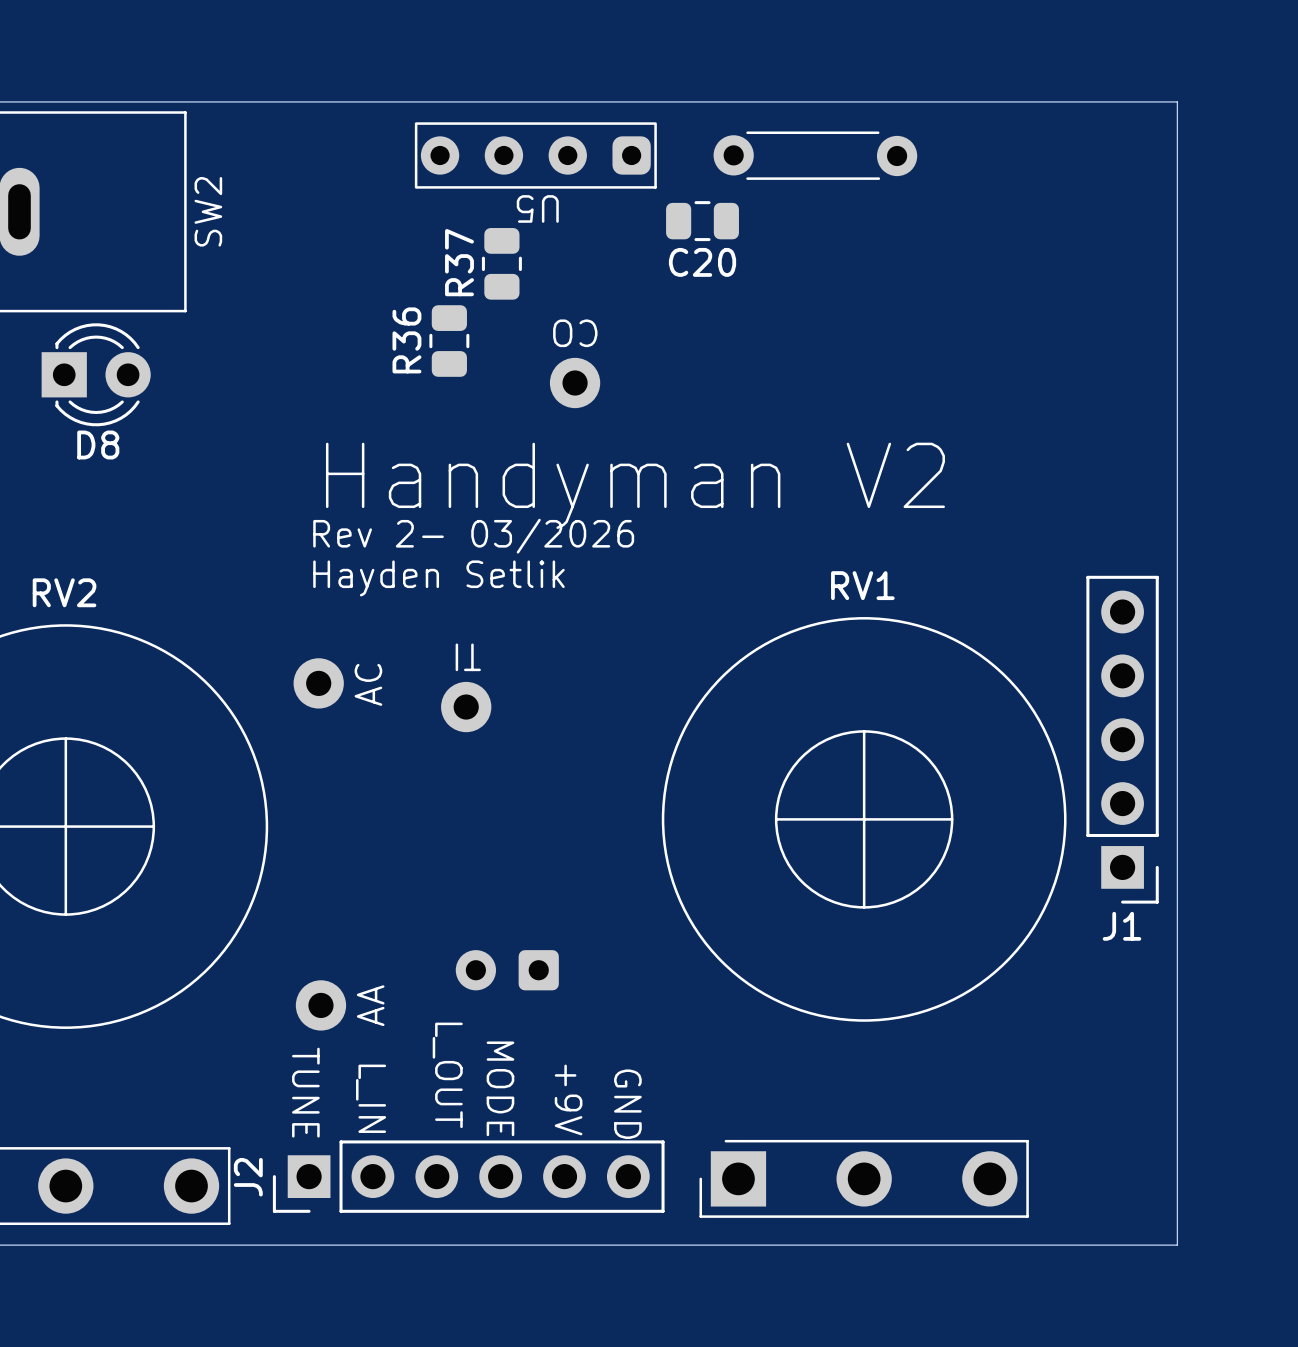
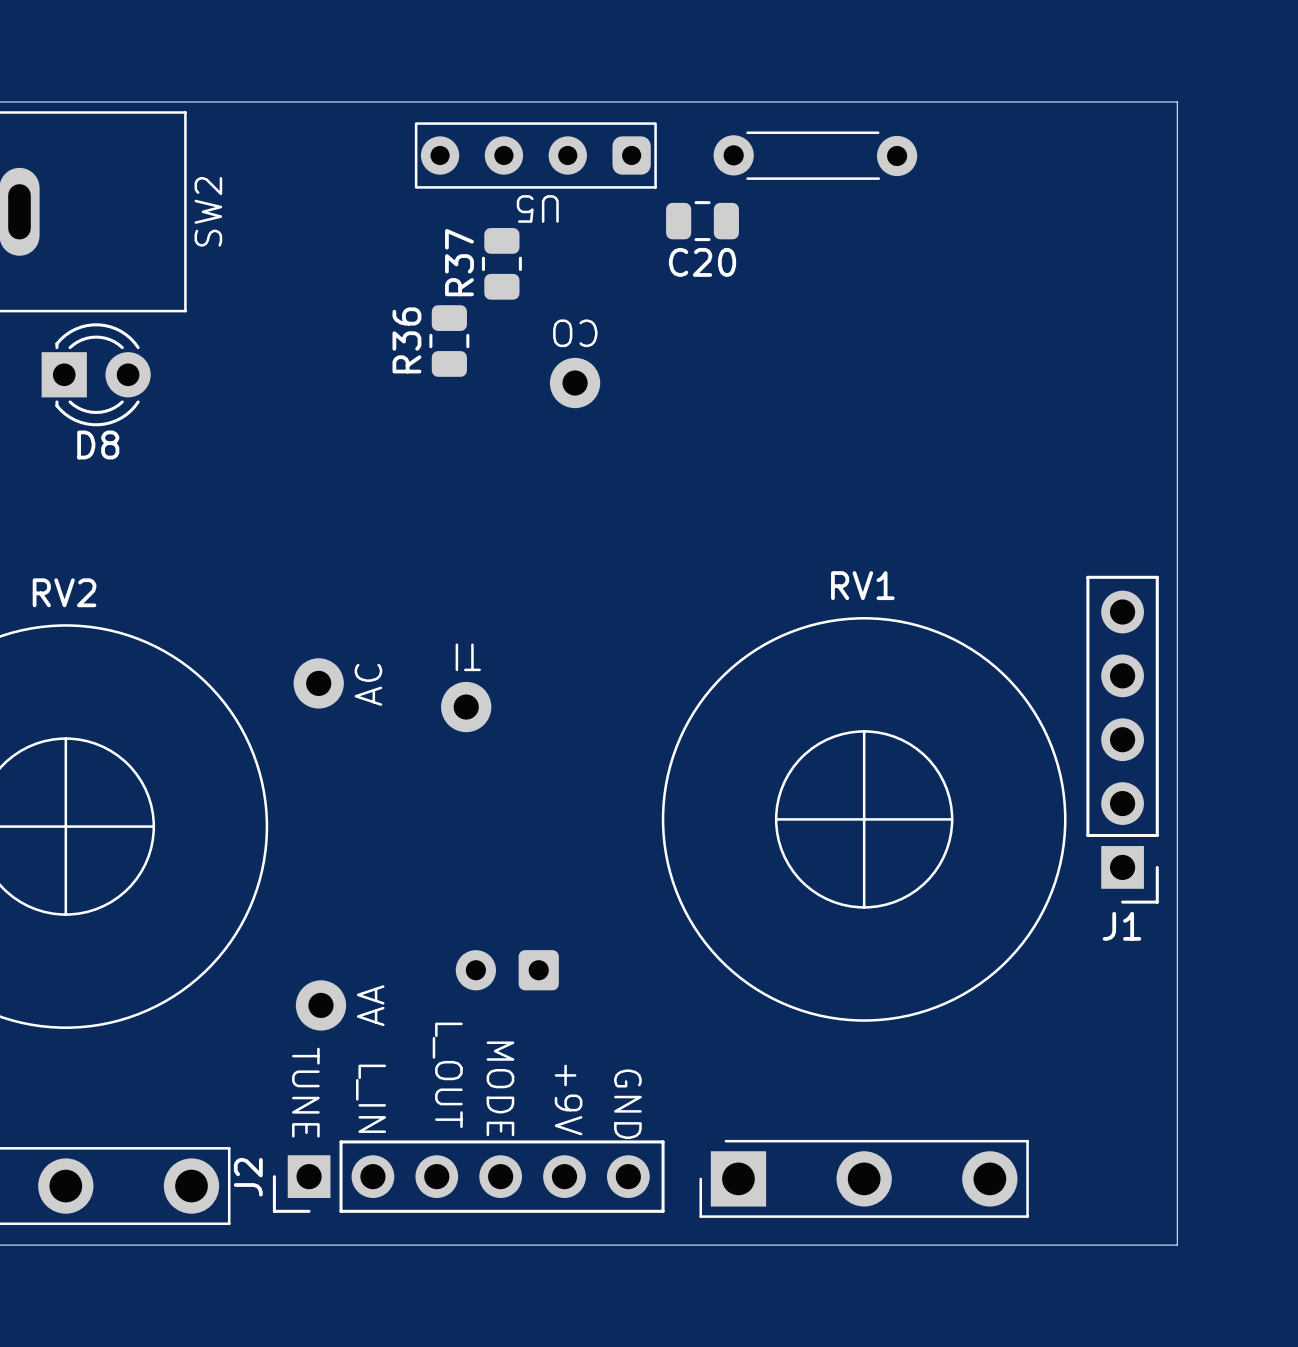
text: Handyman V2 (635, 485) -> none
text: Rev 2- 03/2026 (473, 536) -> none
text: Hayden Setlik (438, 578) -> none

